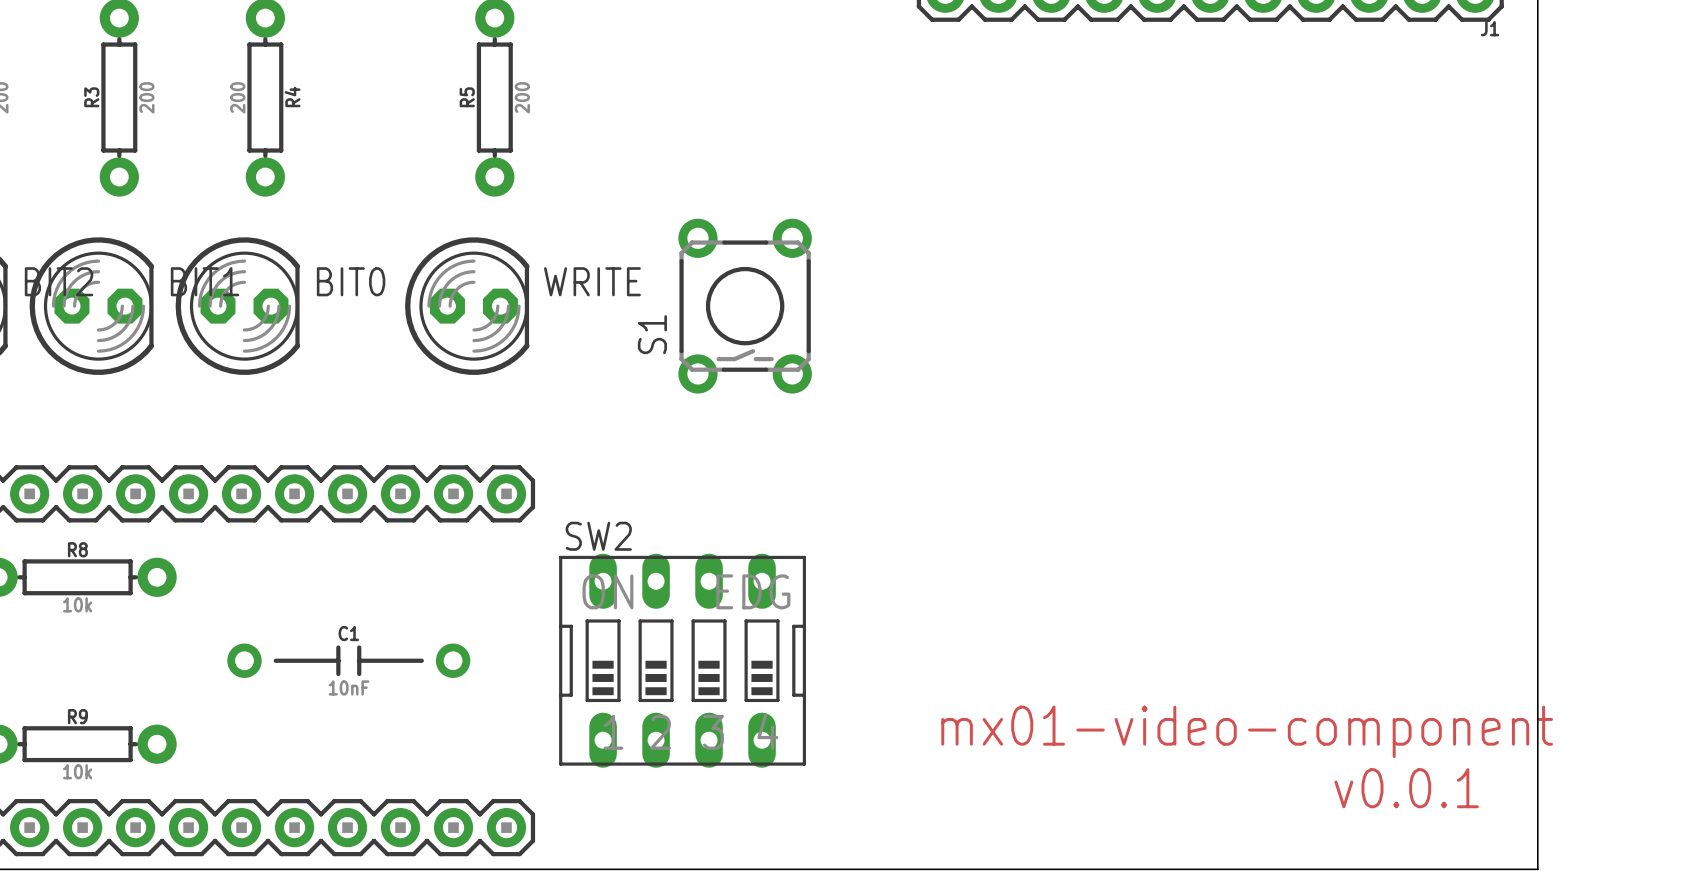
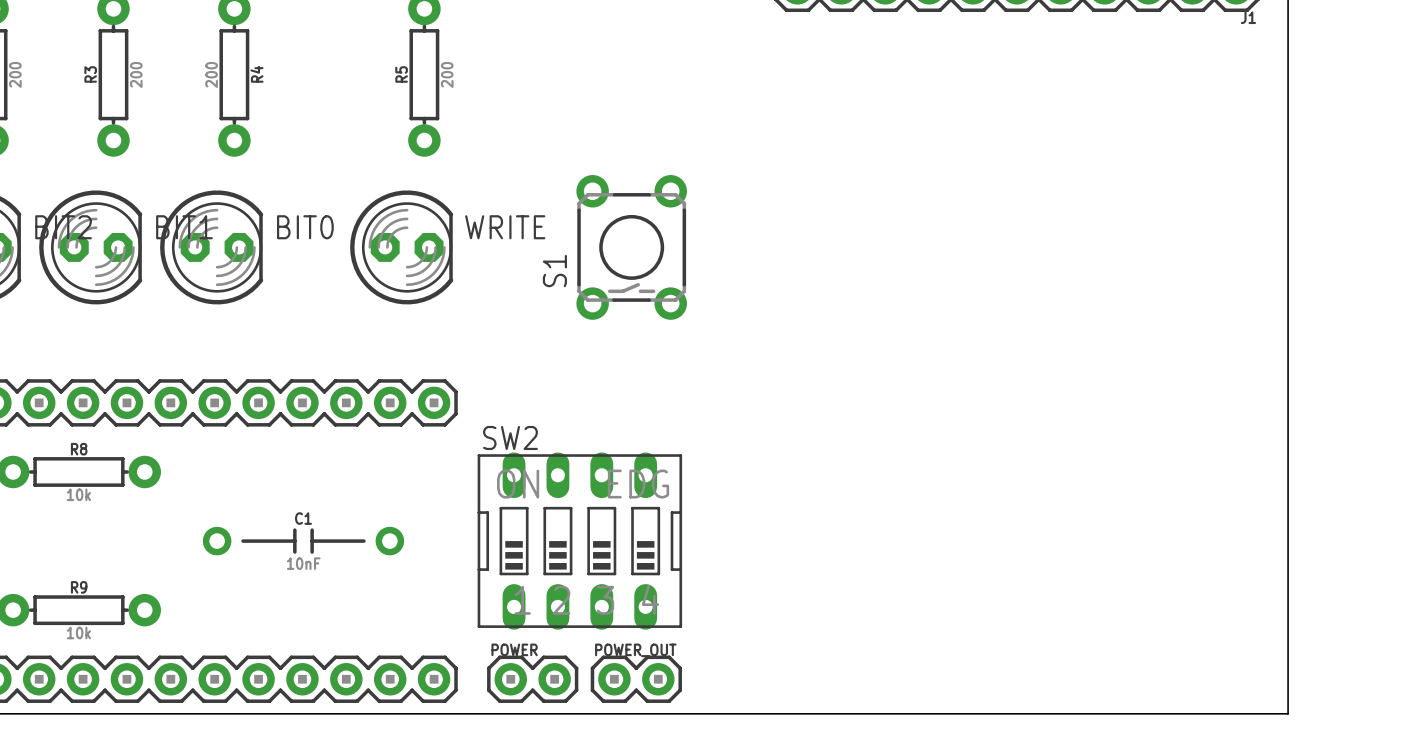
text: mx01-video-component (1247, 731) -> none
text: v0.0.1 (1406, 788) -> none
POWER: none -> (532, 679)
POWER_OUT: none -> (636, 679)

